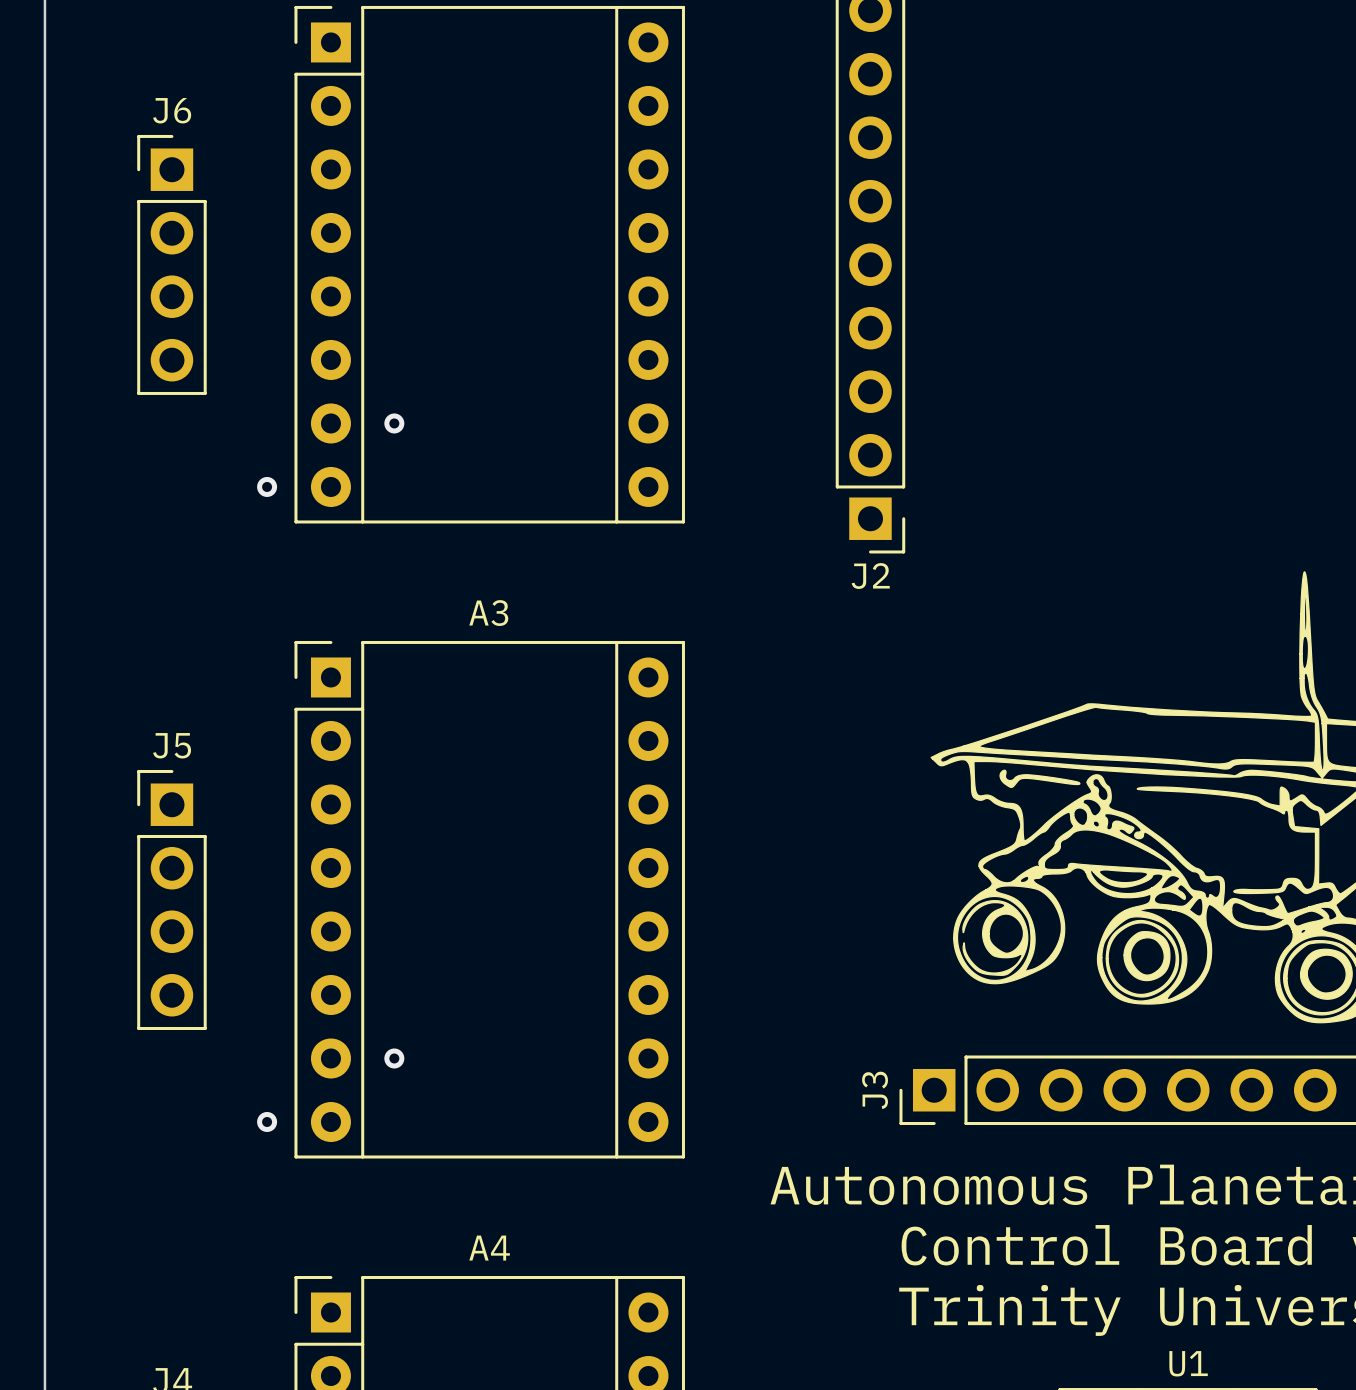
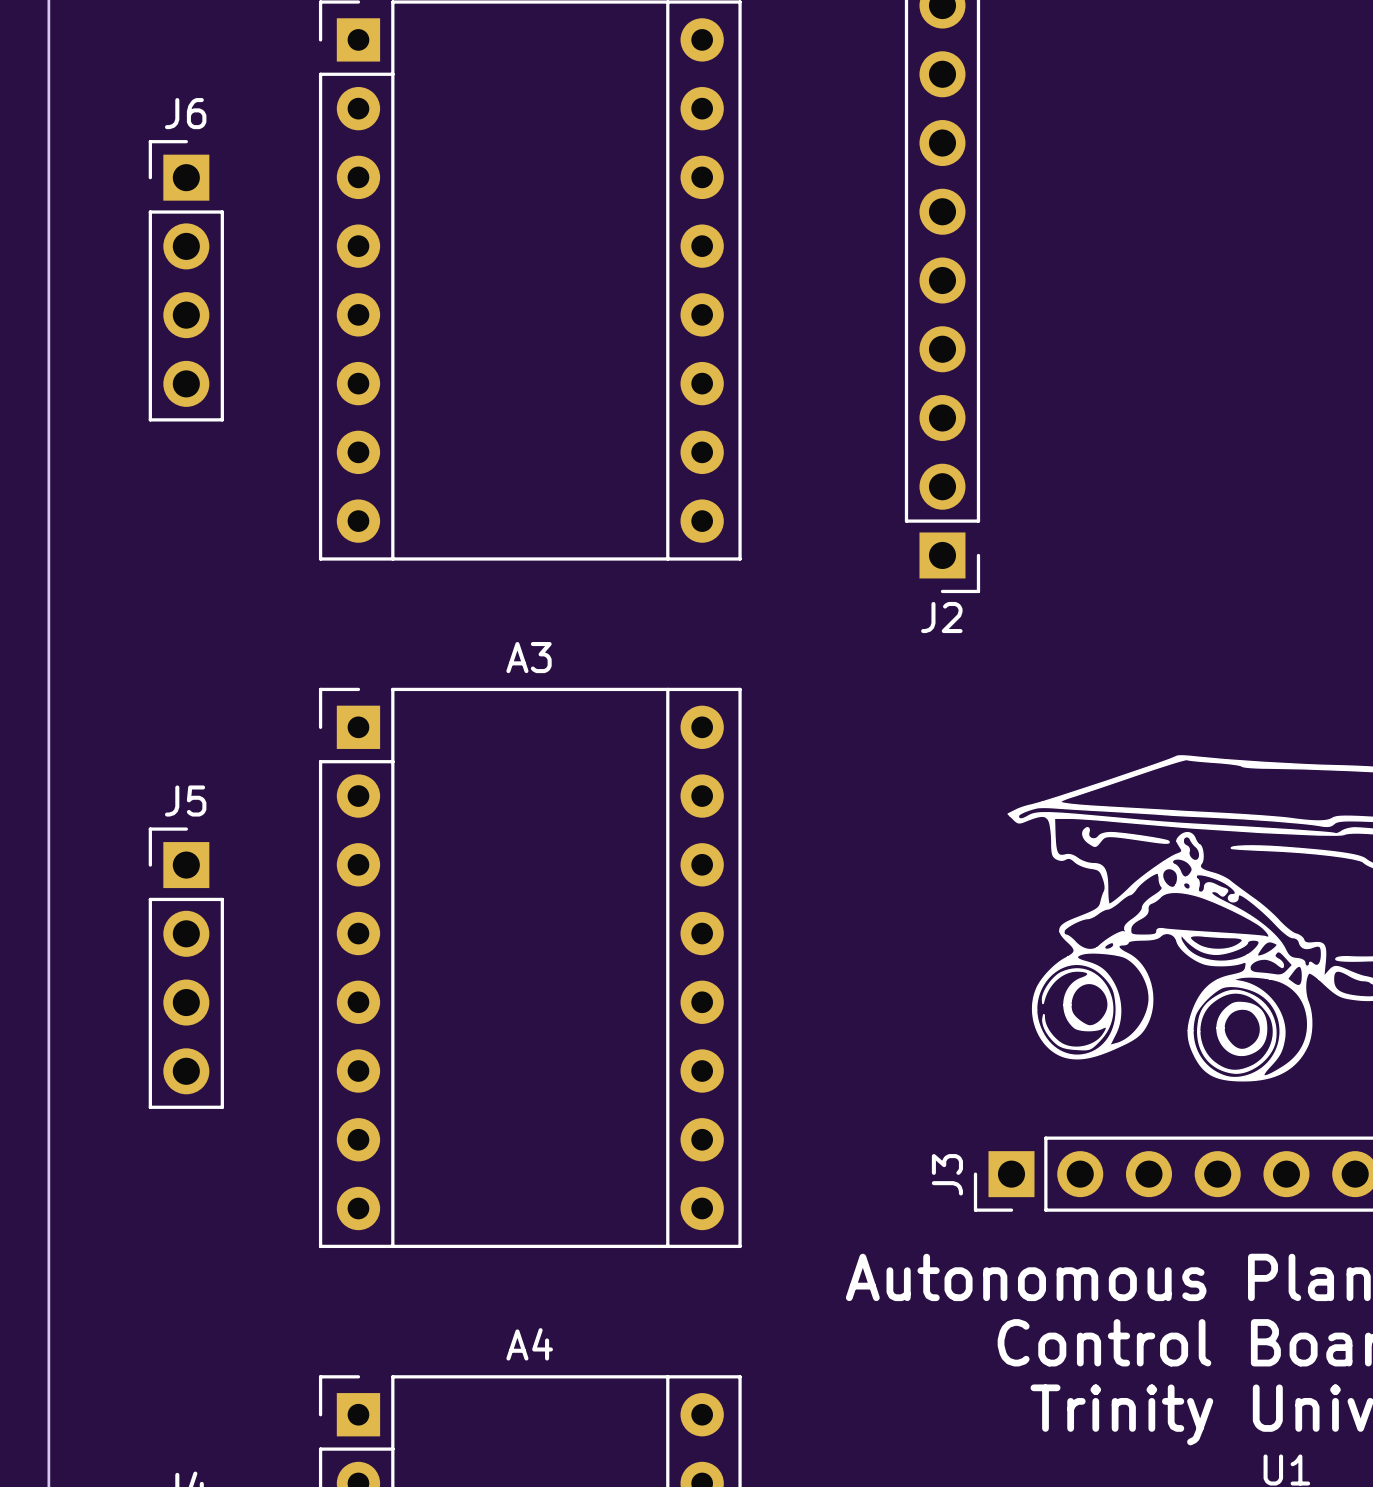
via: (394, 423) -> none
via: (267, 486) -> none
via: (394, 1058) -> none
via: (267, 1121) -> none

